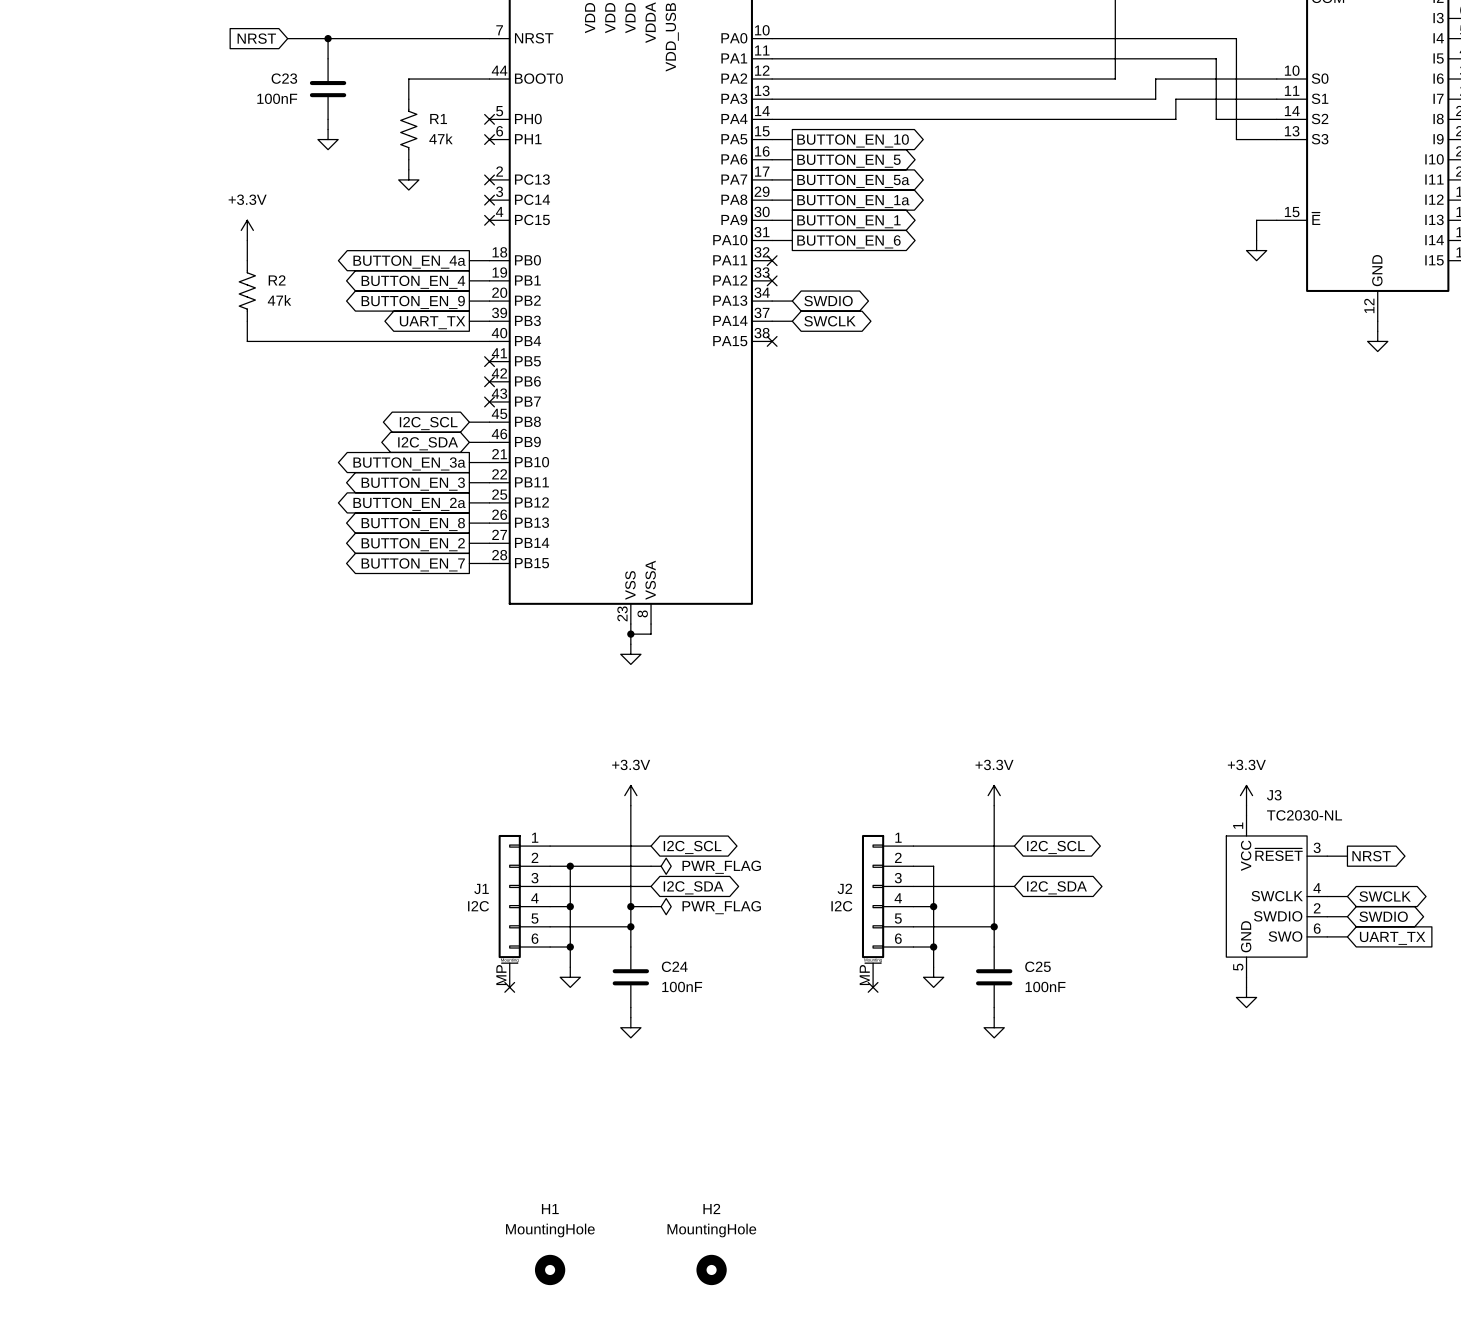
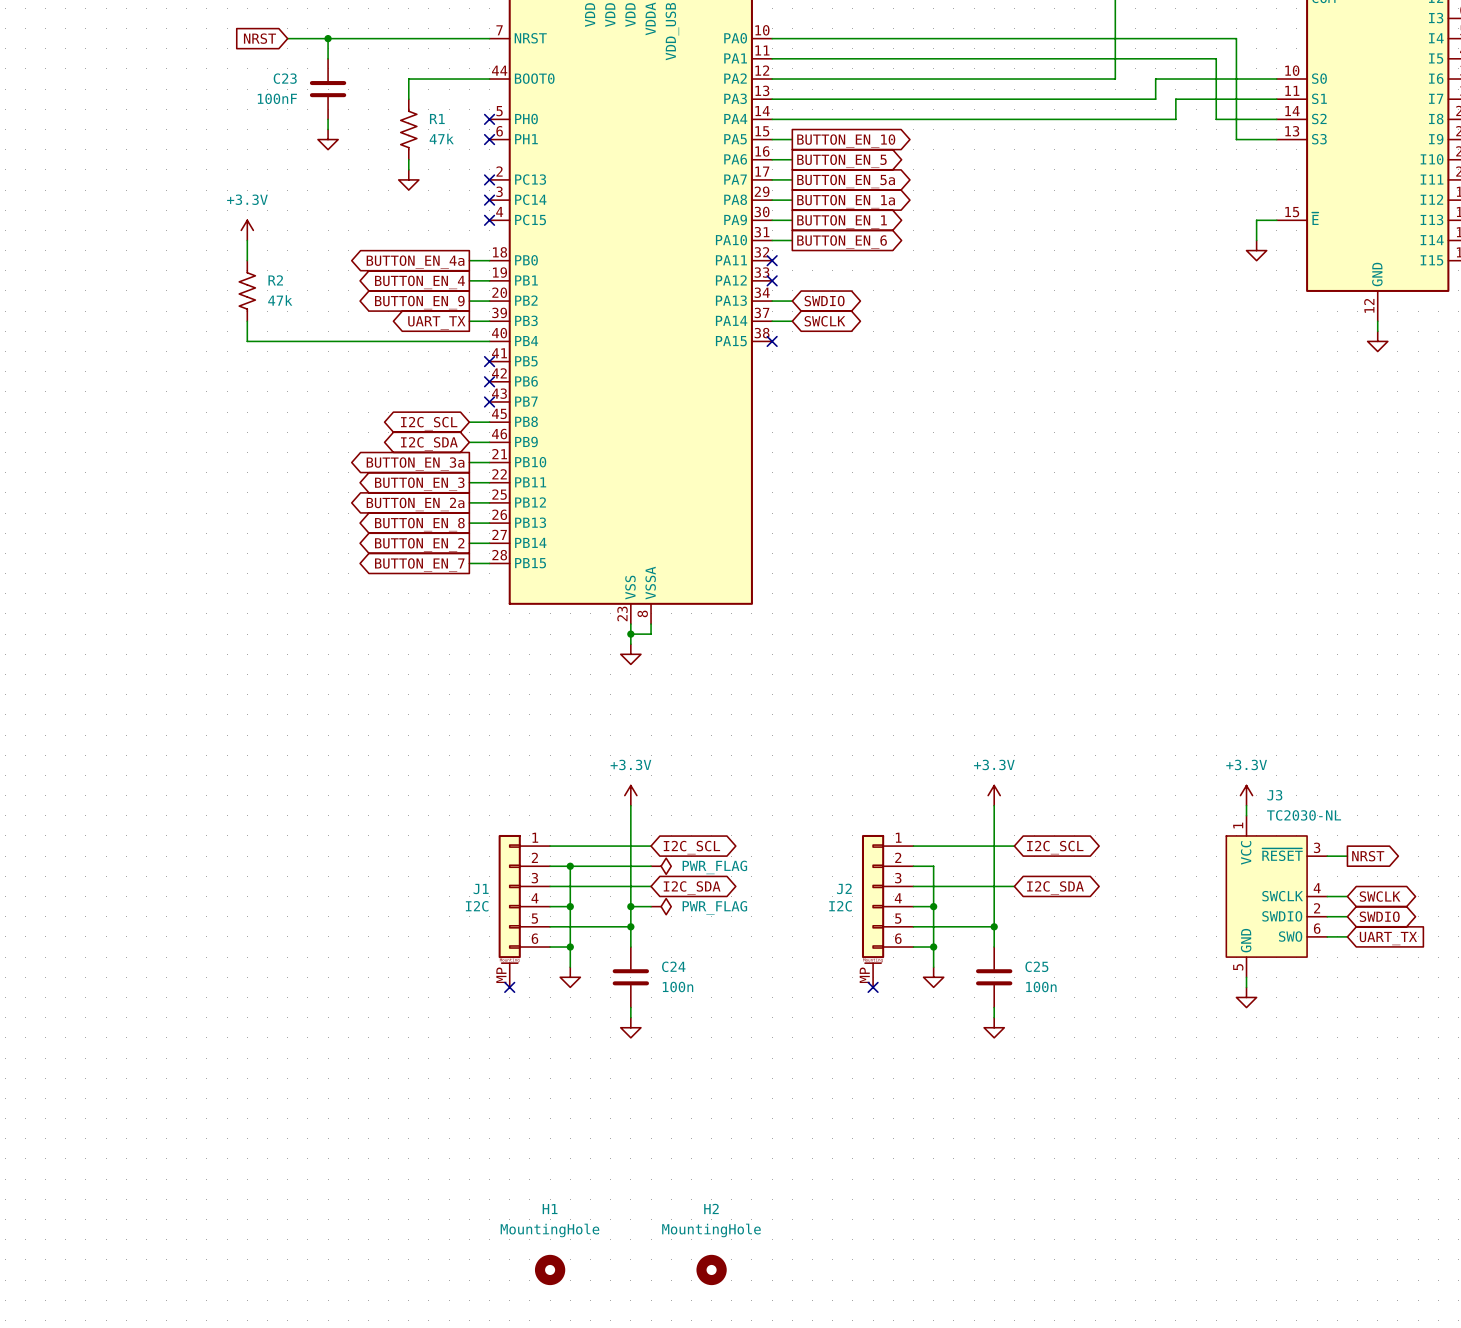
C24 value: 100nF (682, 986) -> 100n (678, 987)
C25 value: 100nF (1045, 986) -> 100n (1041, 987)

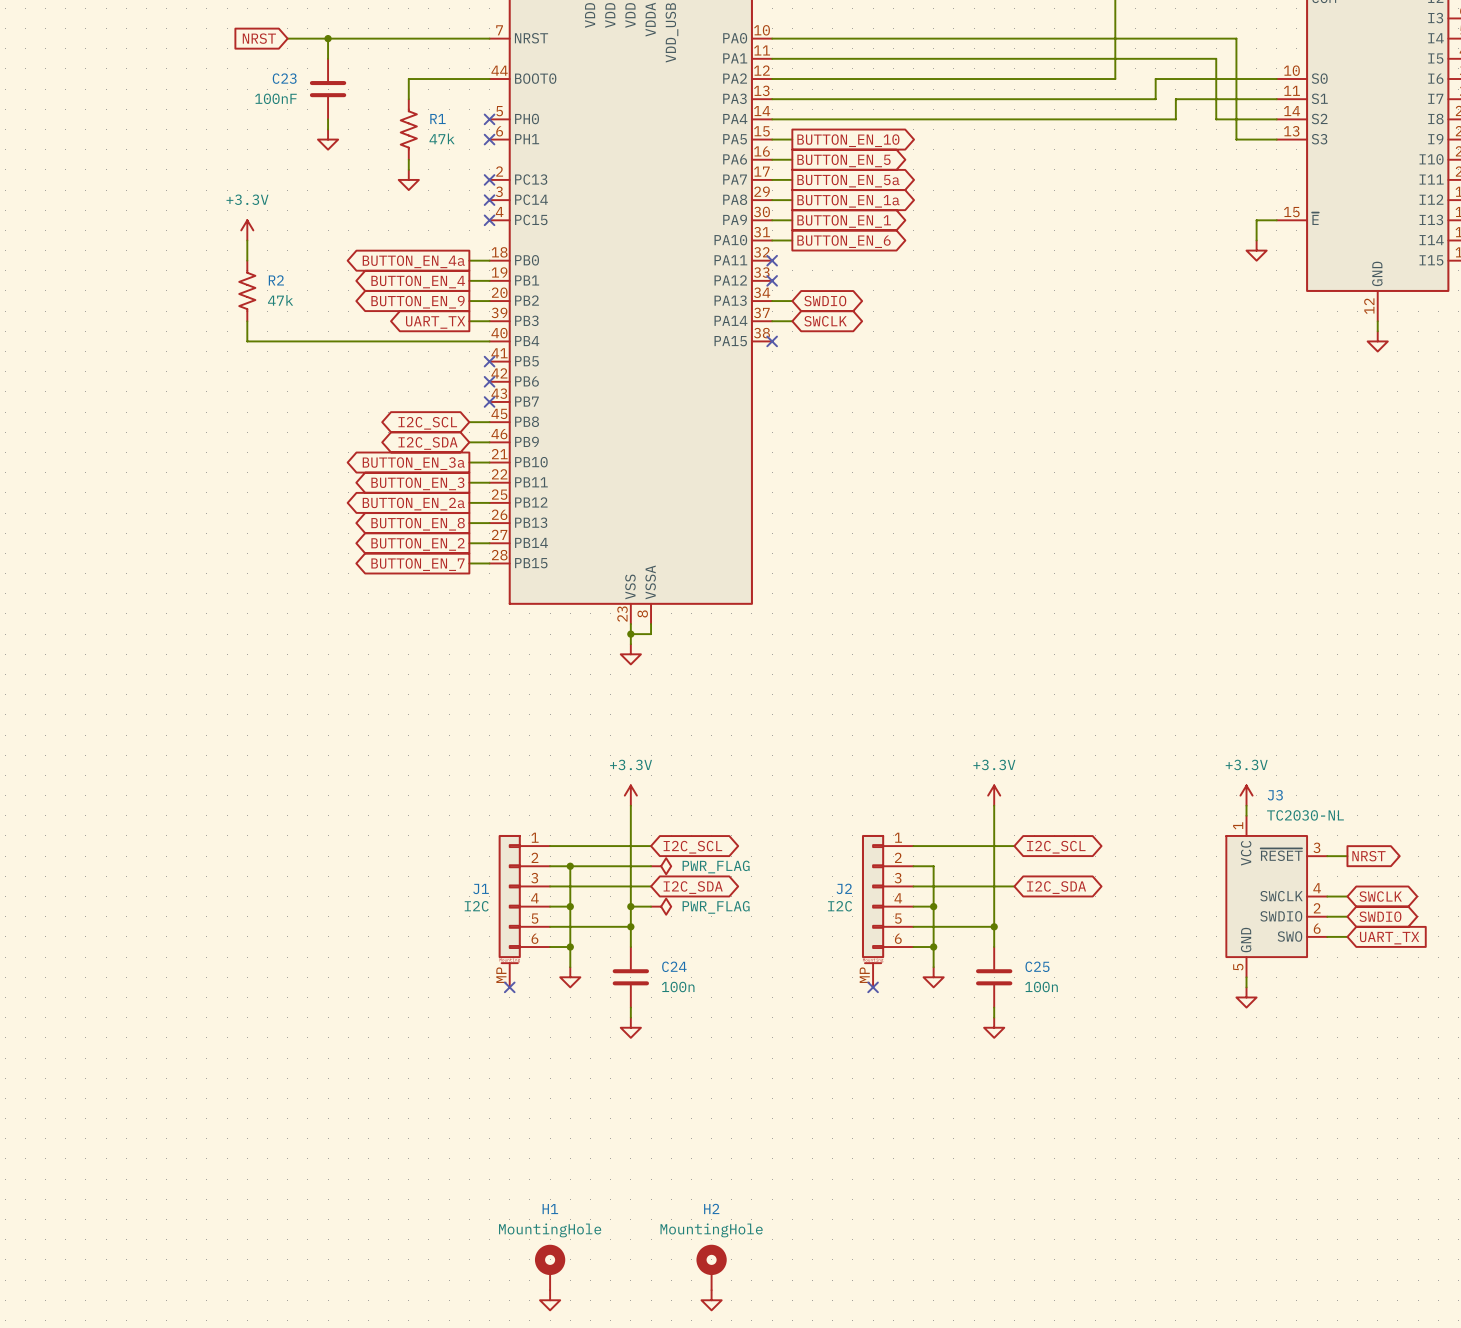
H1 symbol: [534, 1254, 566, 1286] -> [534, 1244, 566, 1291]
H2 symbol: [696, 1254, 727, 1286] -> [696, 1244, 727, 1291]
power symbol: none -> (550, 1300)
power symbol: none -> (711, 1300)

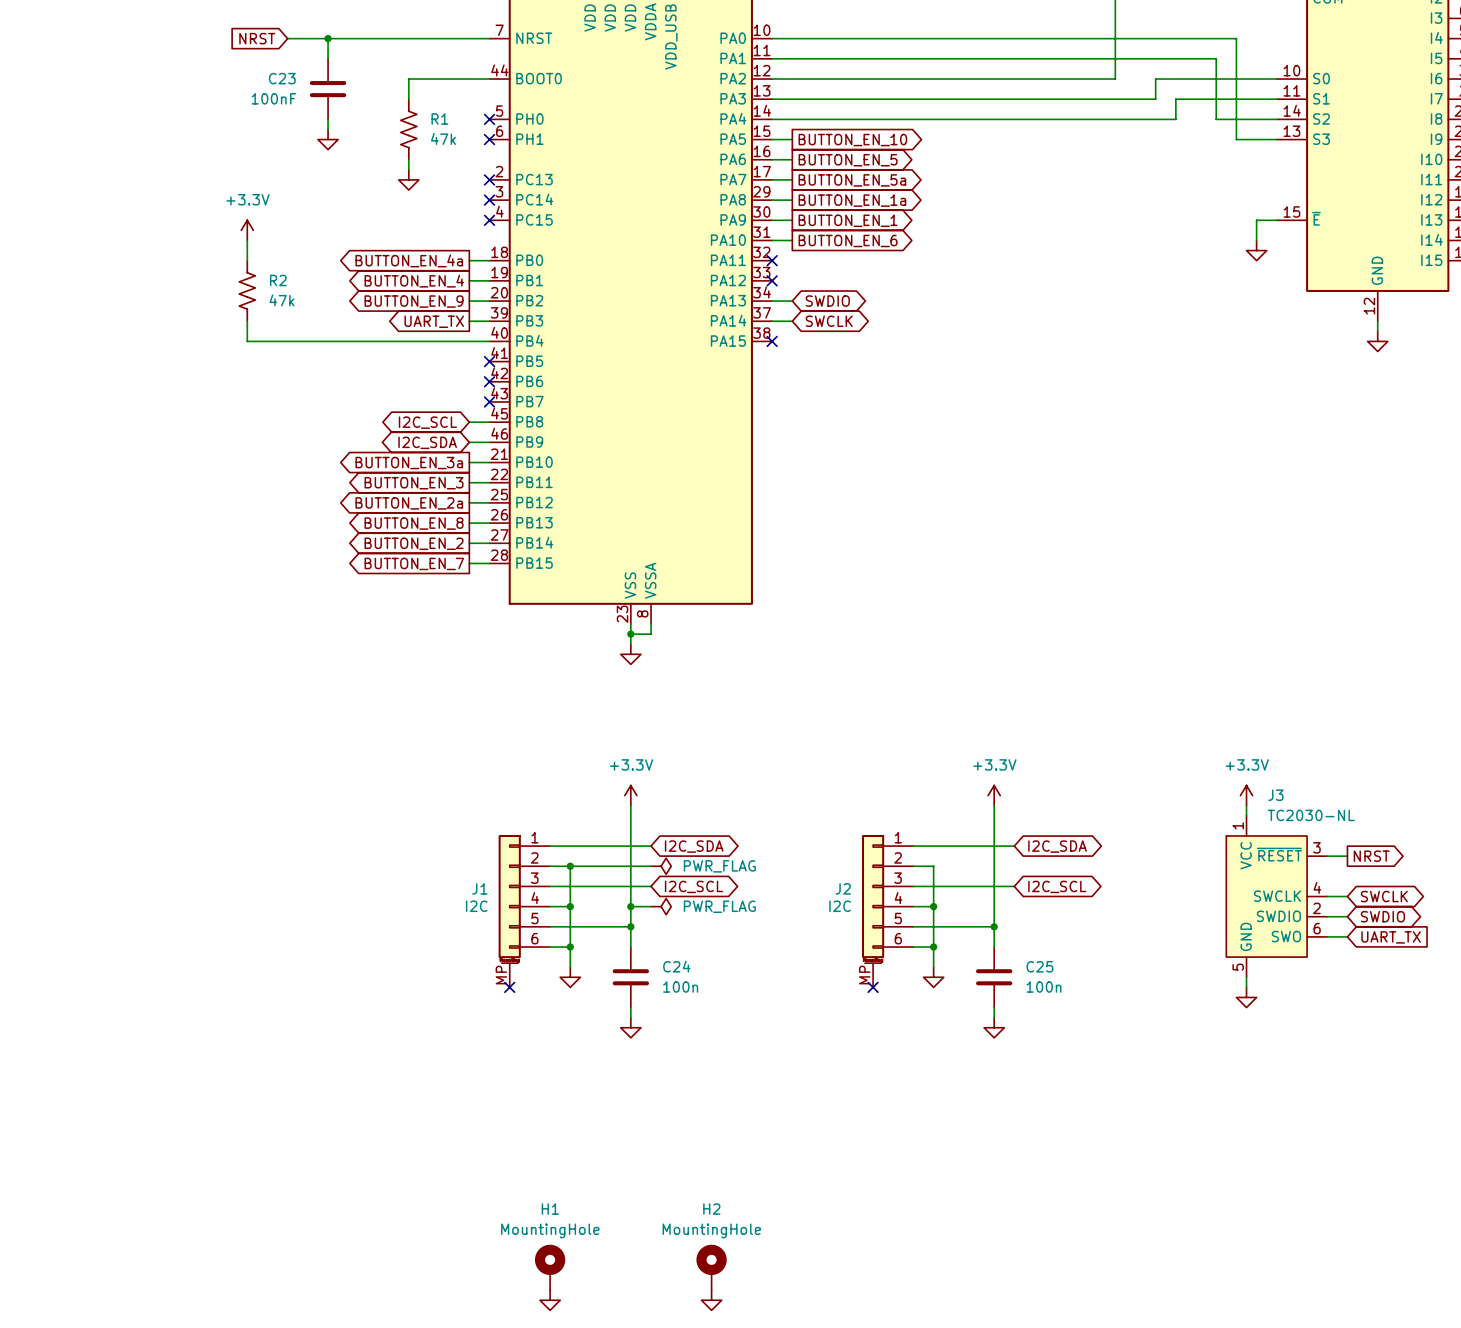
global label: I2C_SCL (692, 847) -> I2C_SDA (694, 846)
global label: I2C_SCL (1056, 847) -> I2C_SDA (1057, 846)
global label: I2C_SDA (693, 887) -> I2C_SCL (693, 886)
global label: I2C_SDA (1056, 887) -> I2C_SCL (1057, 886)

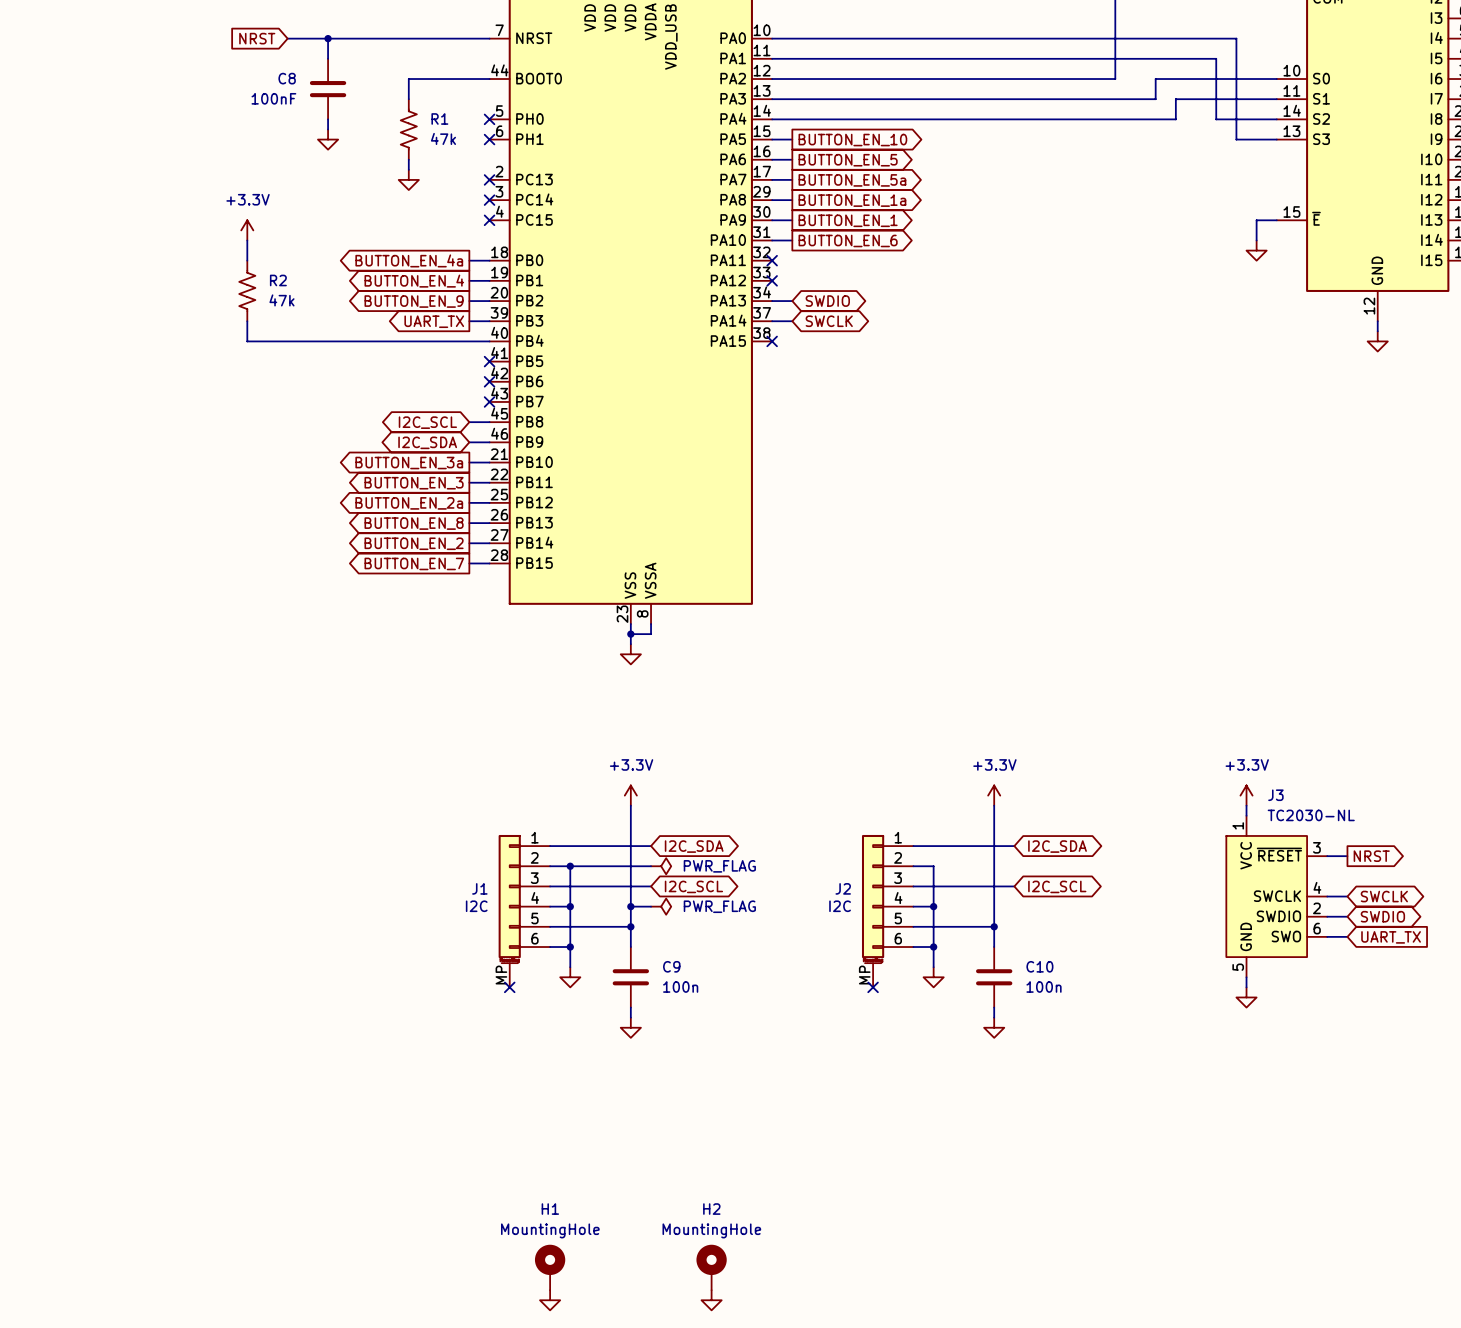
C23 name: C23 (282, 78) -> C8 (287, 78)
C24 name: C24 (676, 966) -> C9 (671, 966)
C25 name: C25 (1039, 966) -> C10 (1039, 966)

